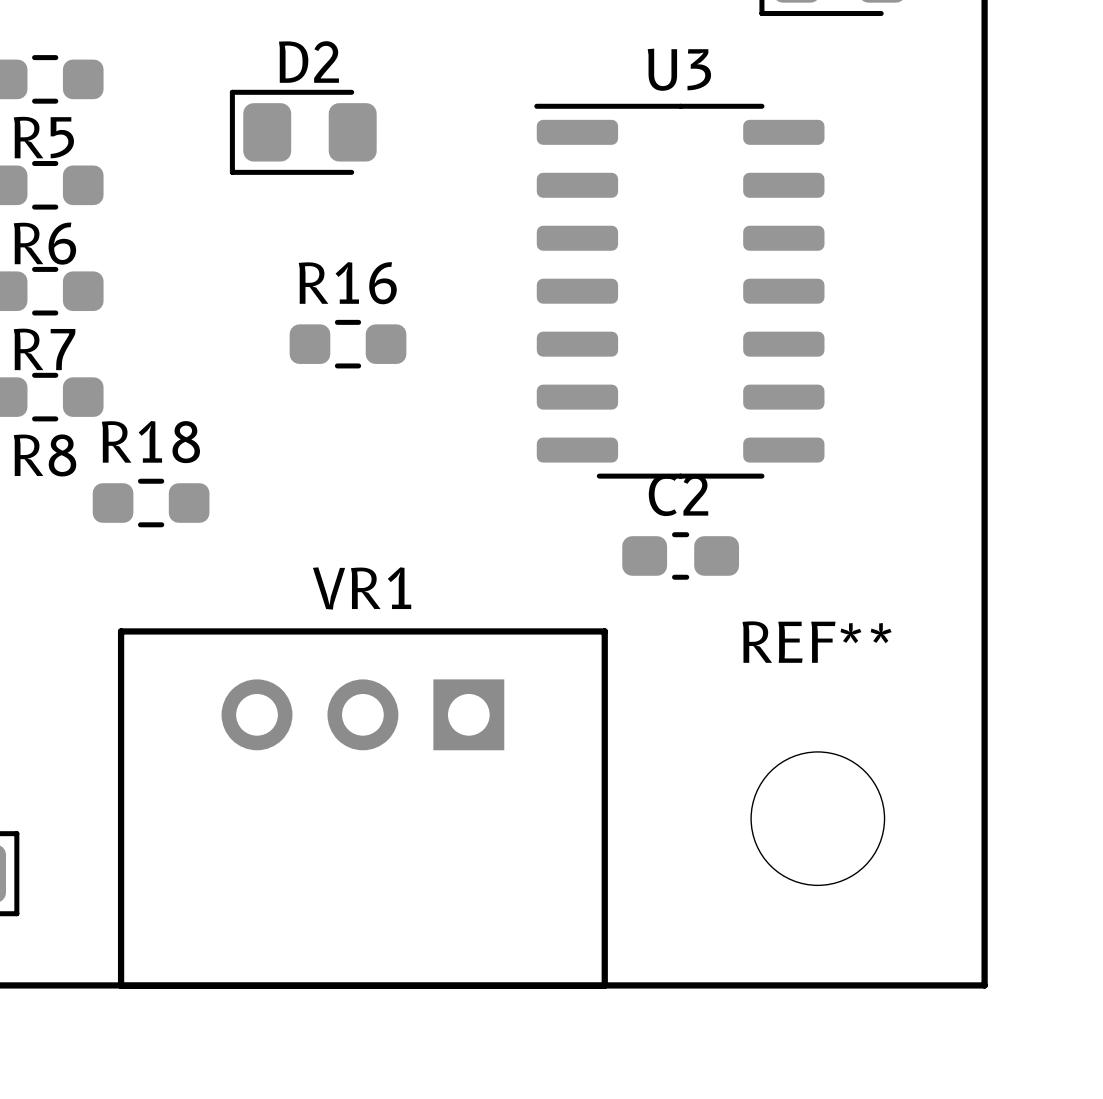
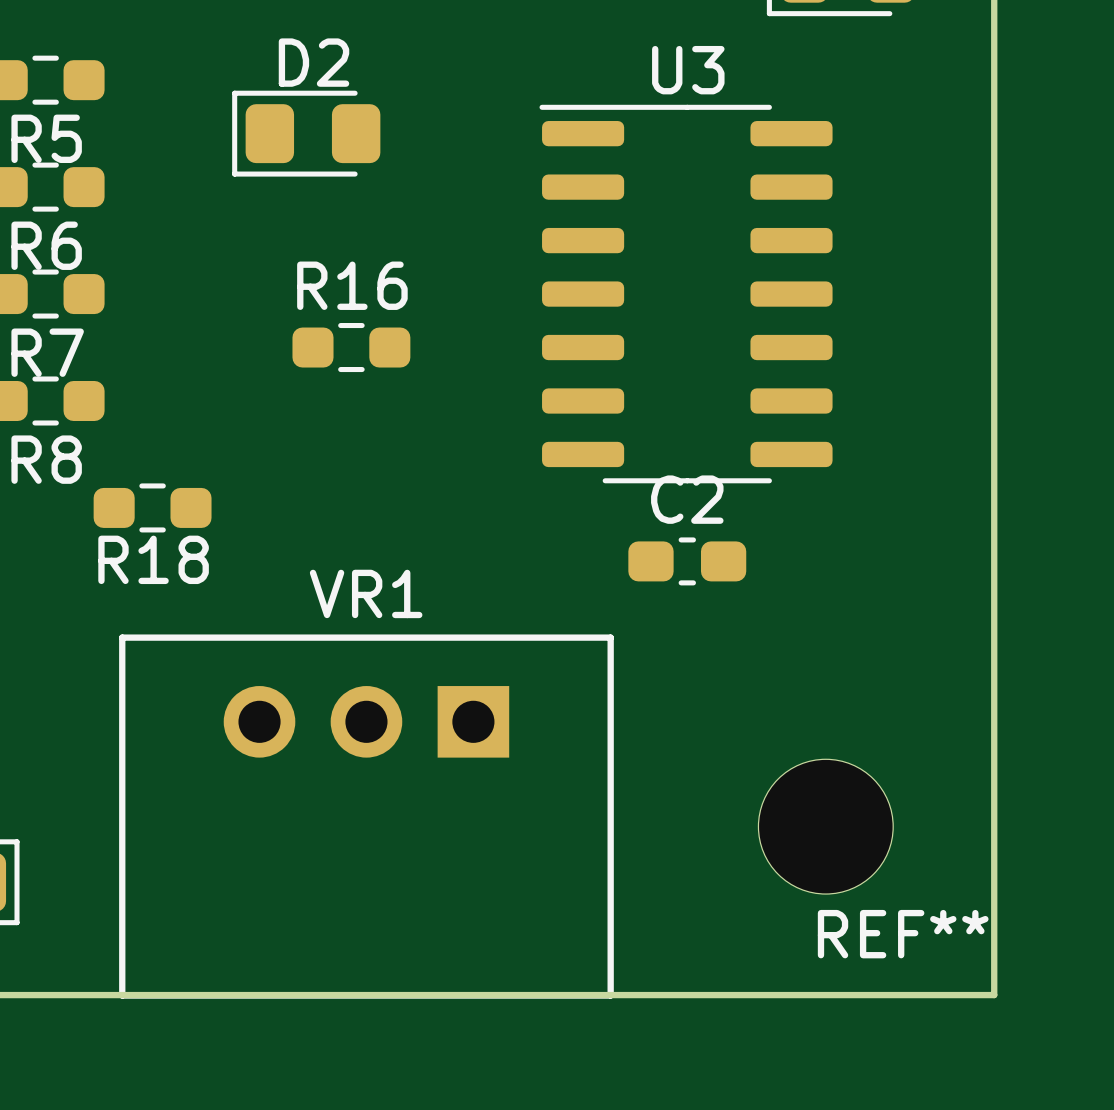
R18 name position: R18 (150, 442) -> R18 (153, 559)
REF** name position: REF** (817, 642) -> REF** (903, 934)

